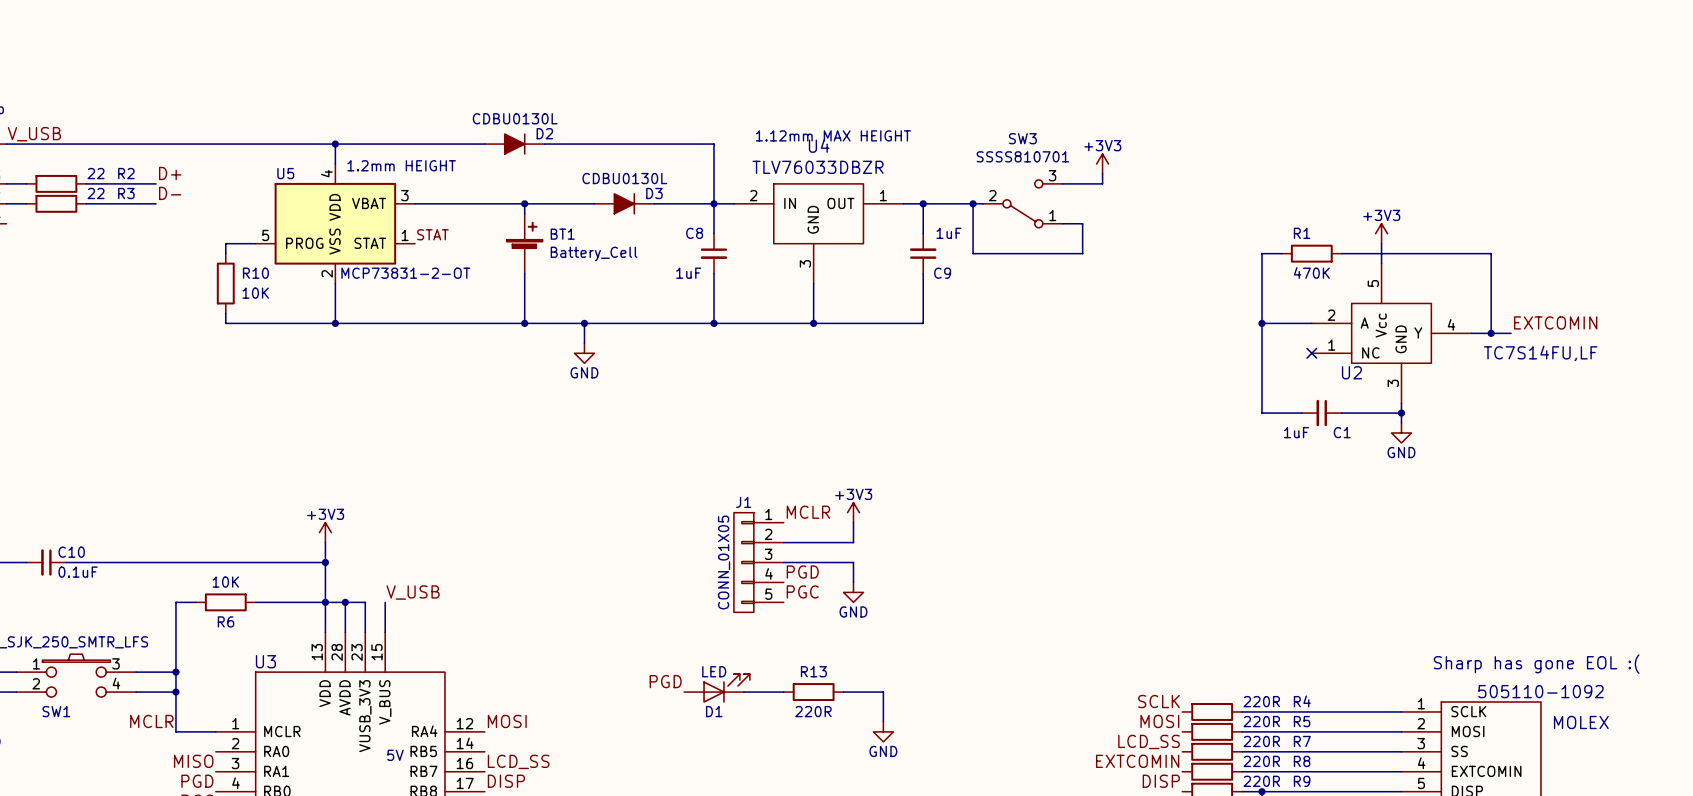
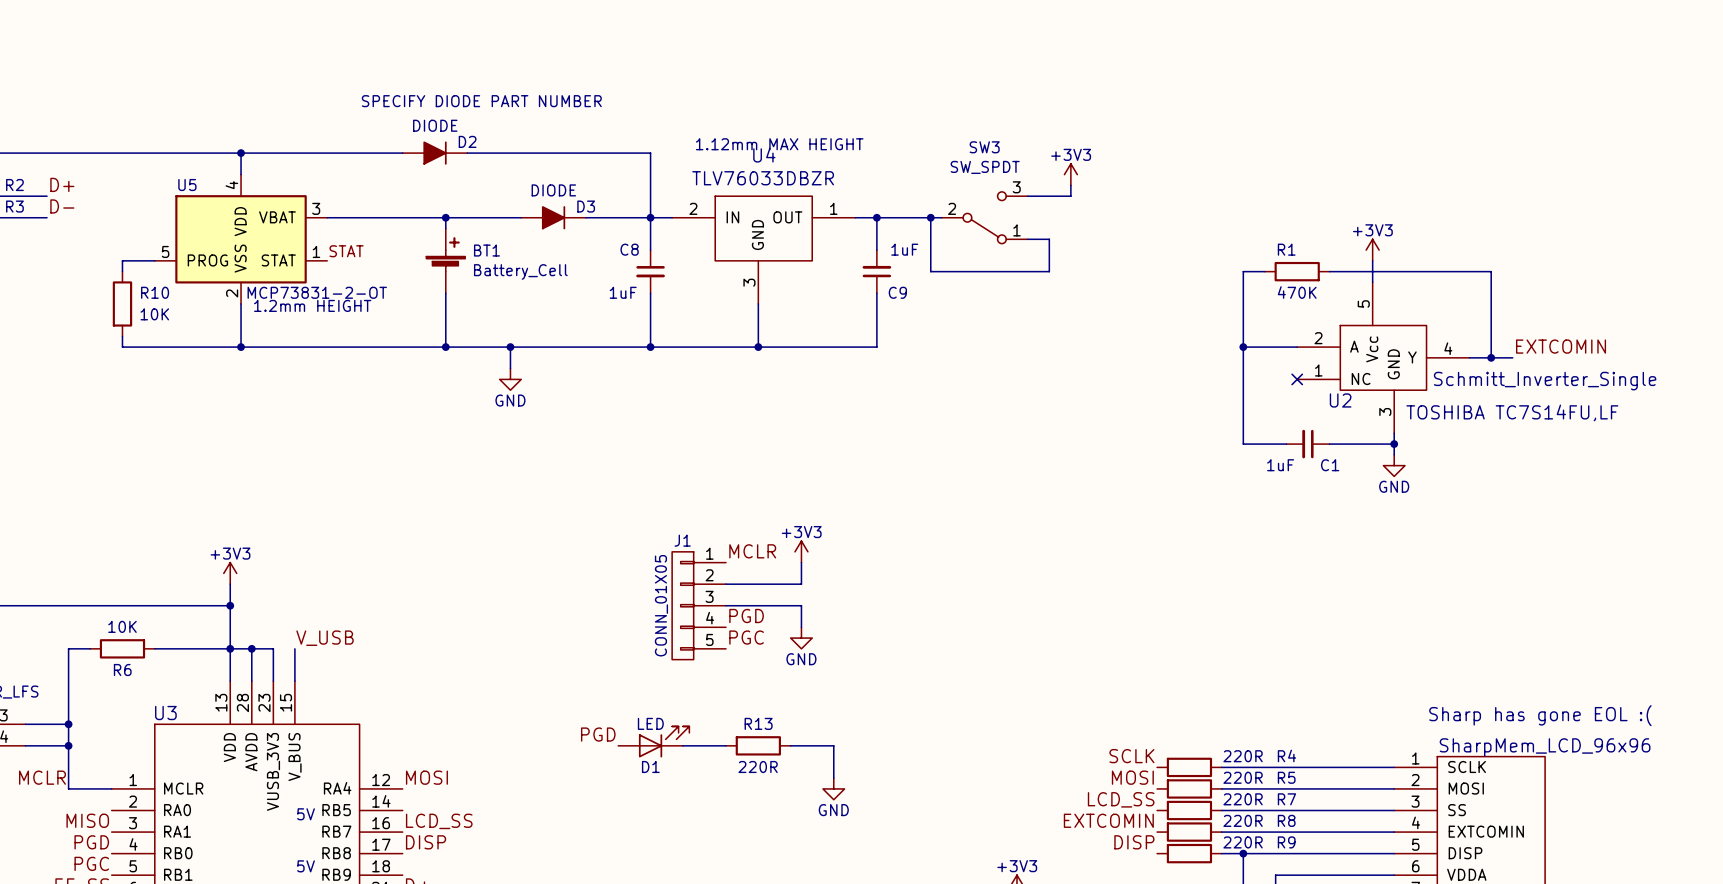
text: none -> SPECIFY DIODE PART NUMBER (481, 101)
D2 value: CDBU0130L (515, 118) -> DIODE (435, 125)
SW3 value: SSSS810701 (1022, 156) -> SW_SPDT (985, 167)
text position: 1.2mm HEIGHT (401, 165) -> 1.2mm HEIGHT (312, 305)
D3 value: CDBU0130L (624, 178) -> DIODE (553, 190)
U2 value: TC7S14FU,LF (1540, 353) -> Schmitt_Inverter_Single (1545, 381)
text: none -> TOSHIBA TC7S14FU,LF (1512, 412)
part value: 505110-1092 (1540, 691) -> SharpMem_LCD_96x96 (1545, 747)
text: MOLEX (1581, 722) -> none

